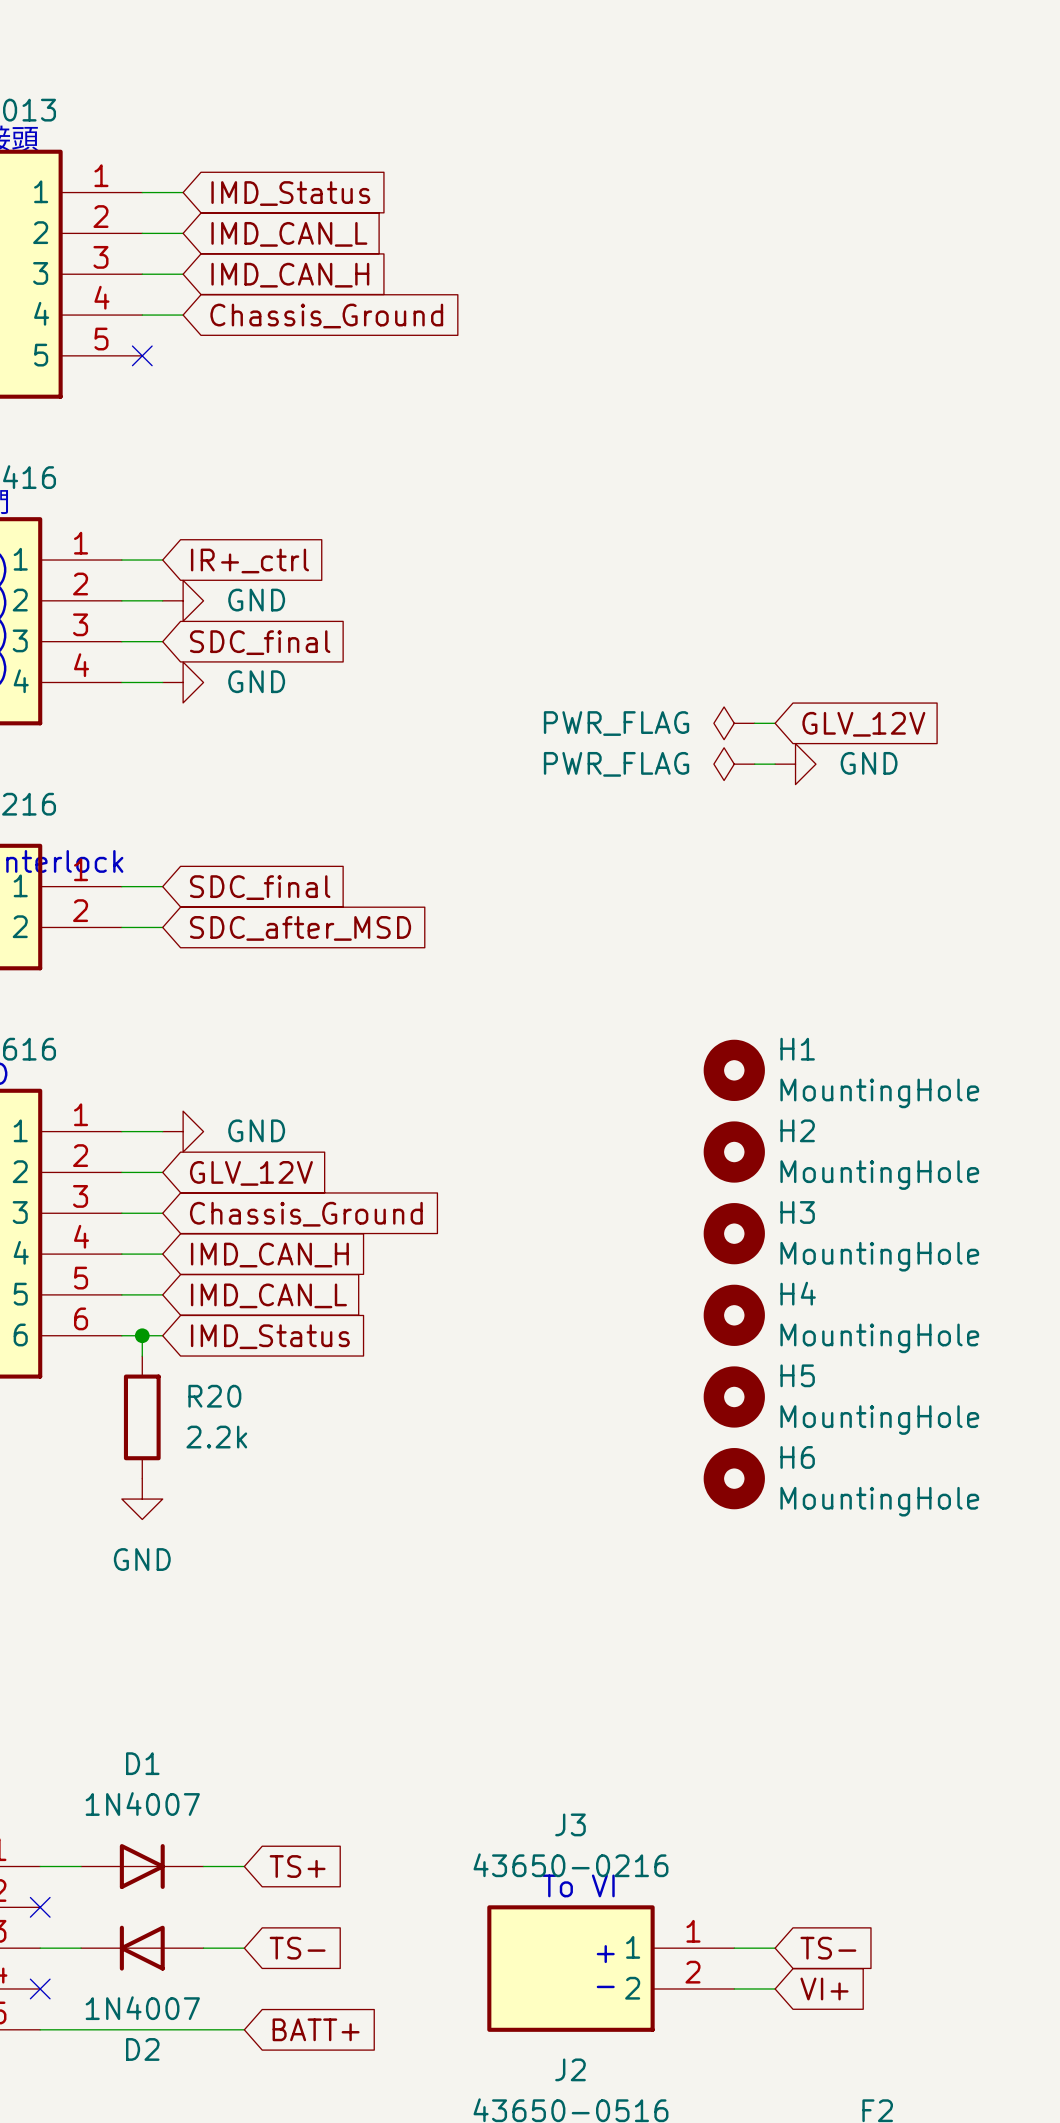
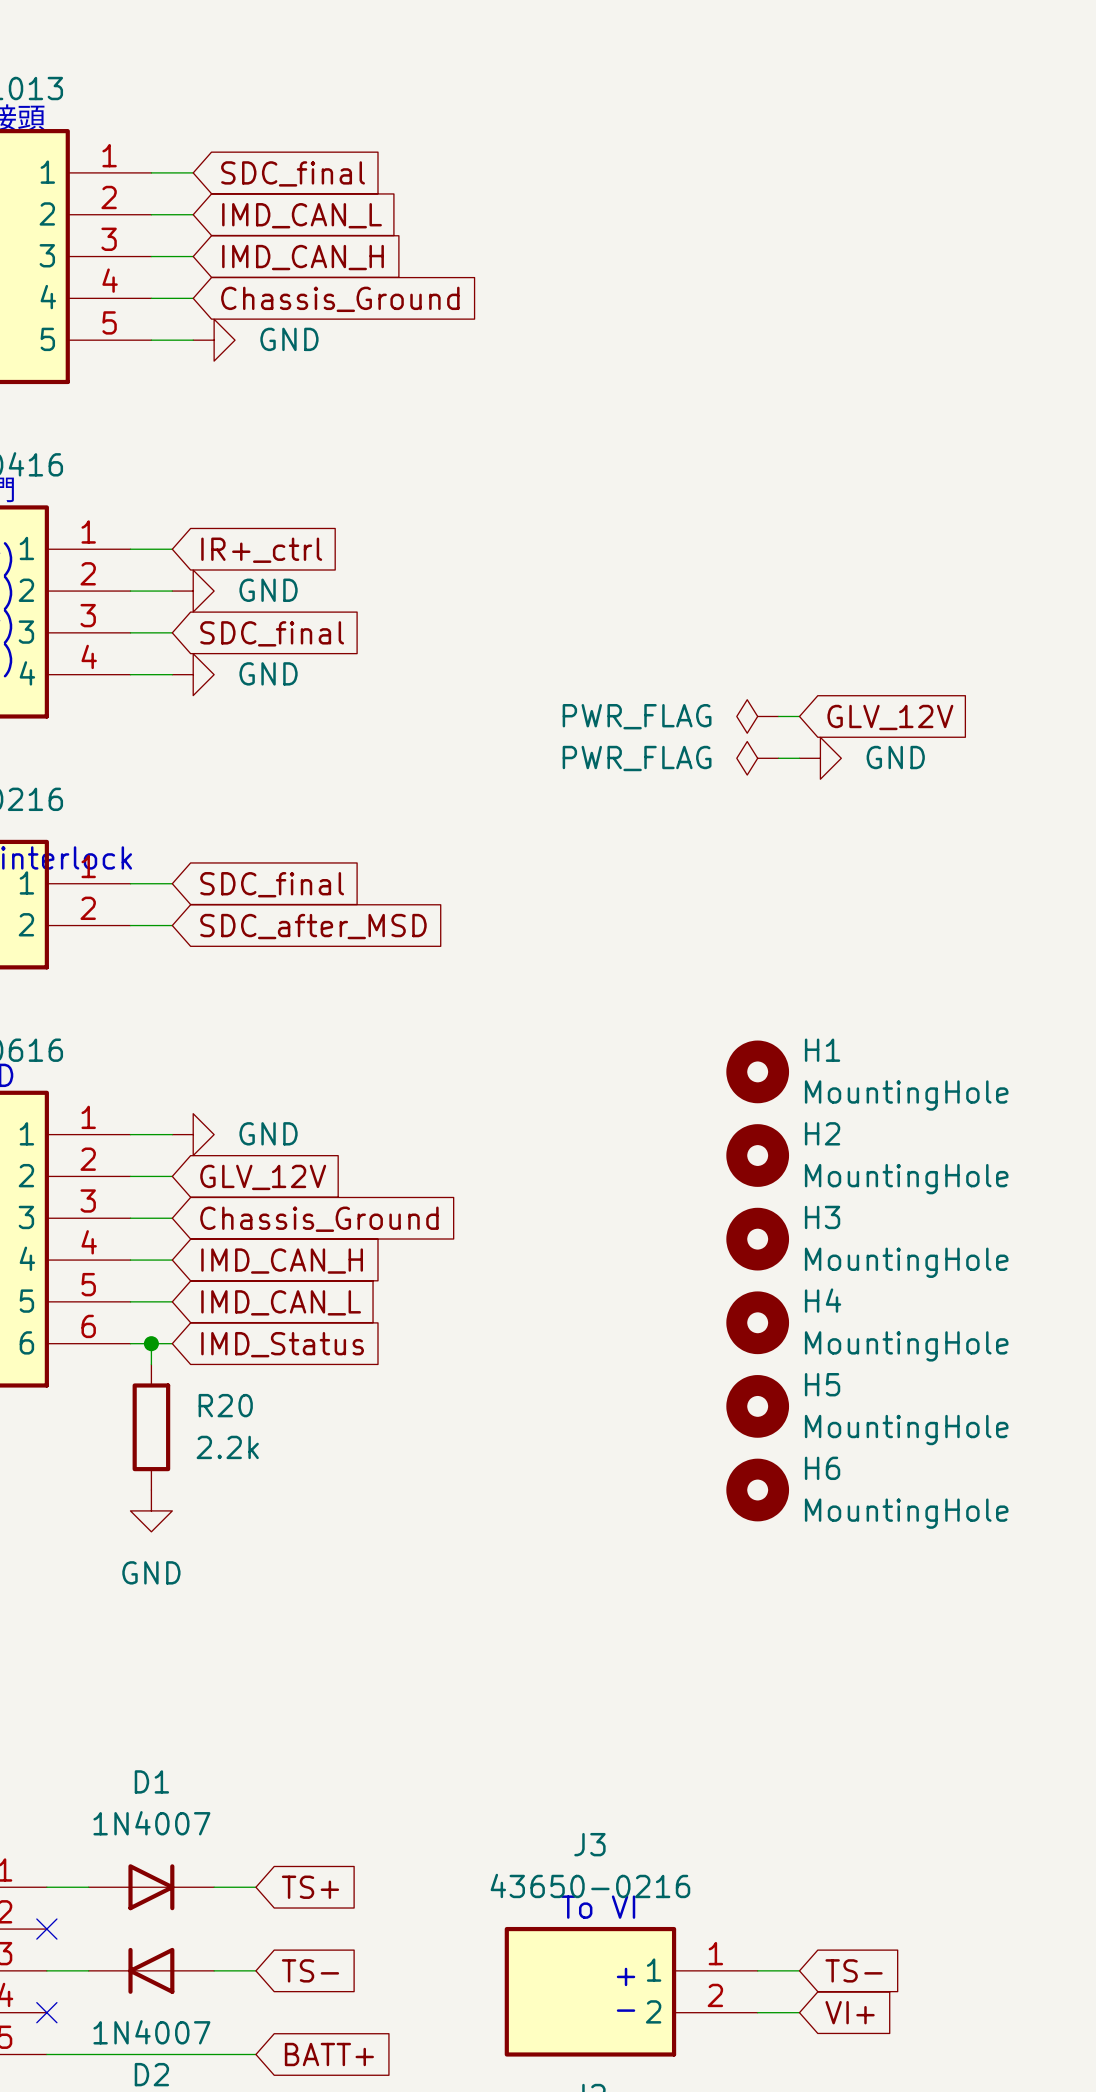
global label: IMD_Status (290, 193) -> SDC_final (293, 173)
wire: none -> (151, 340) (193, 340)
no-connect mark: (142, 355) -> none
power symbol: none -> GND (214, 340)

